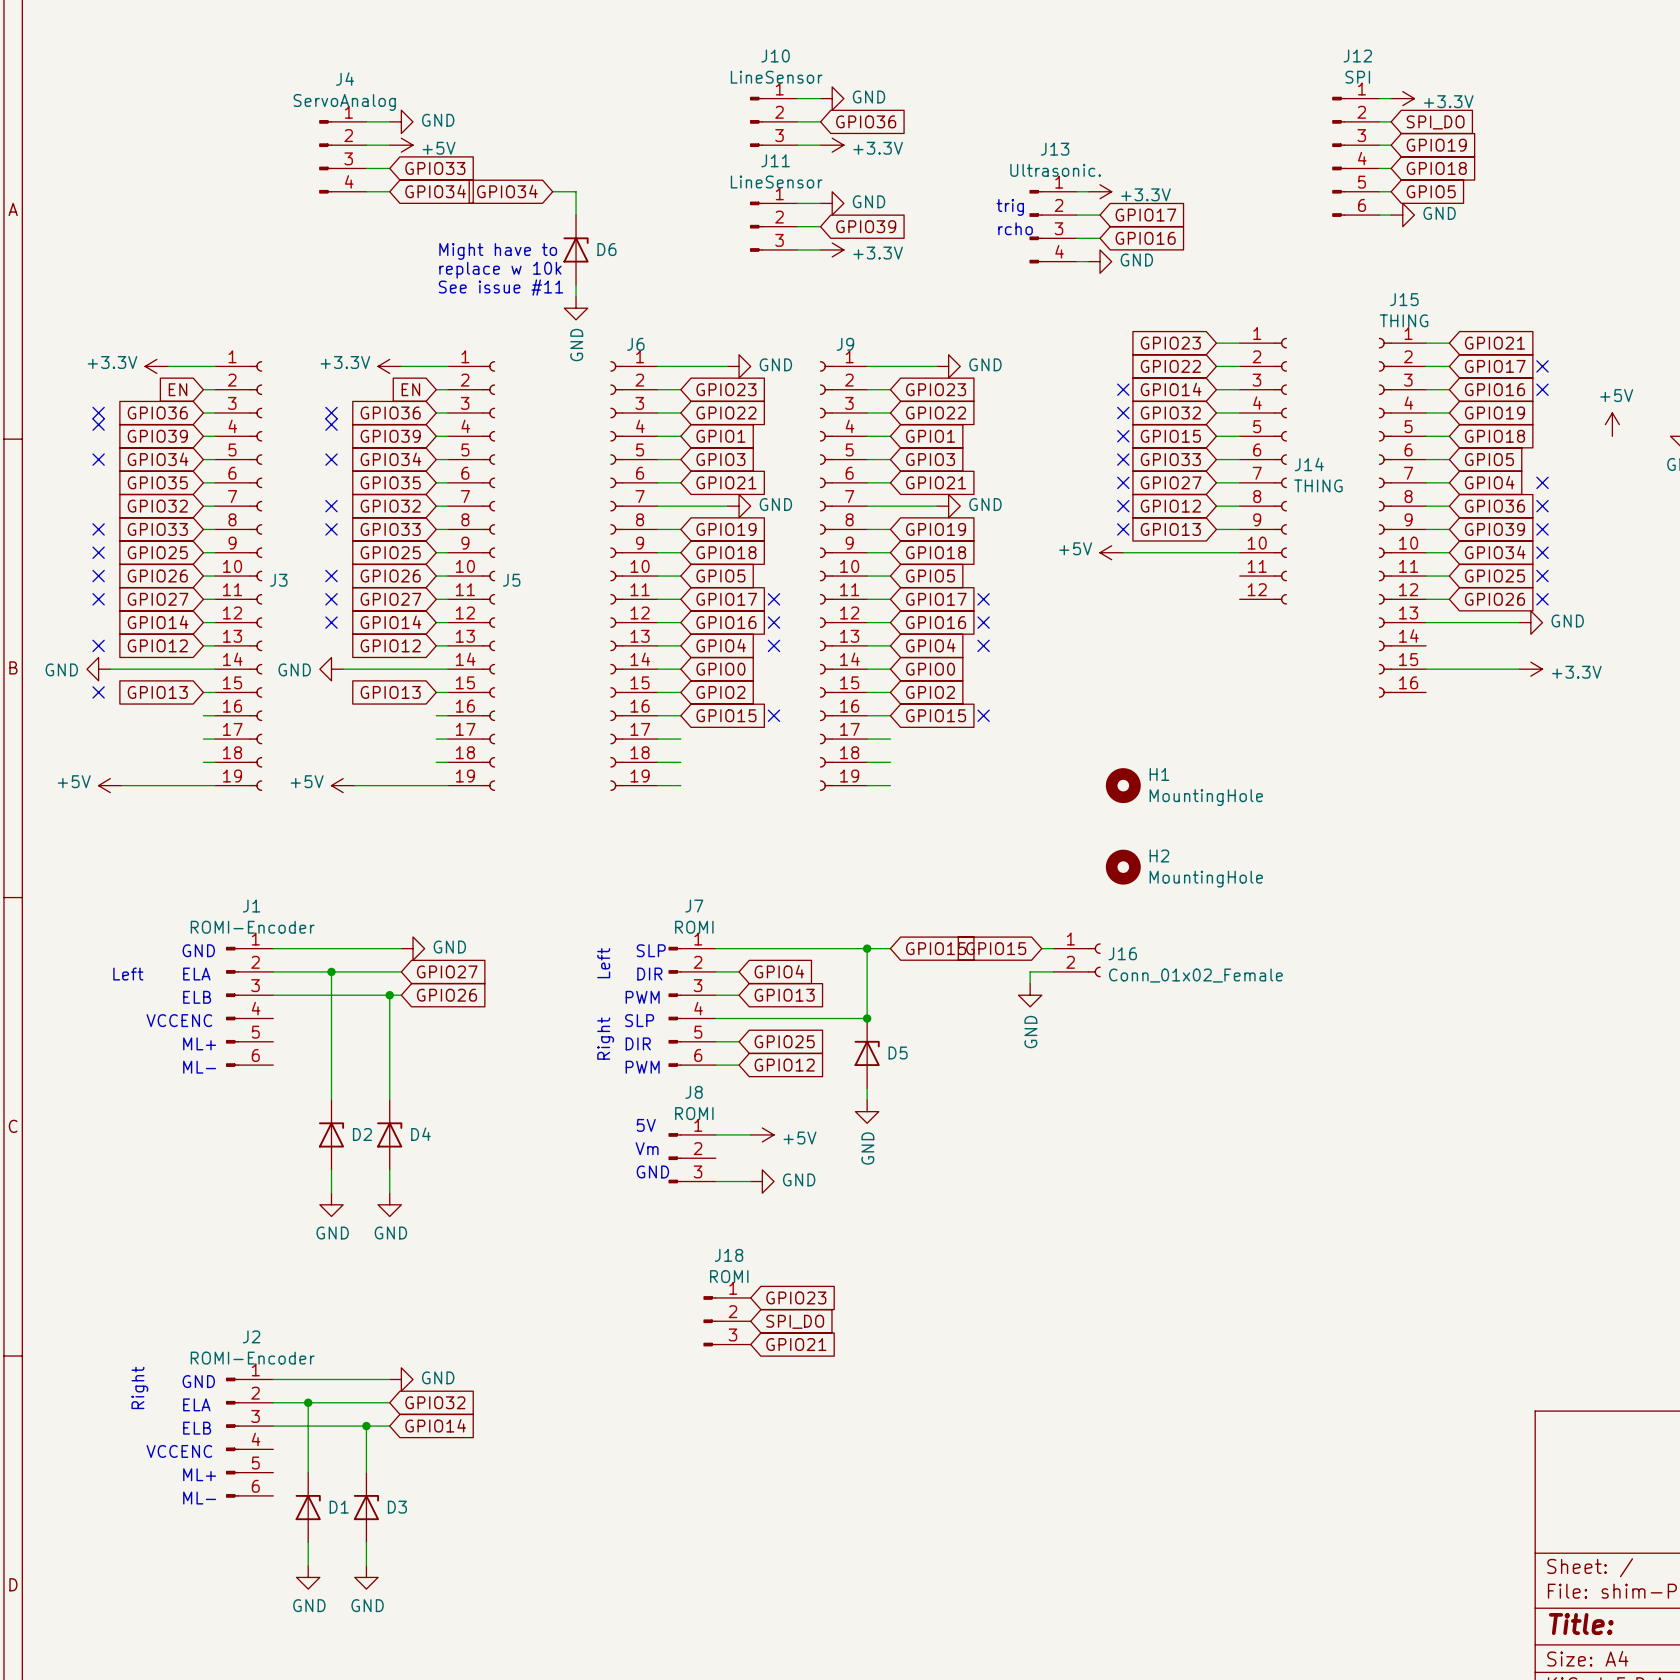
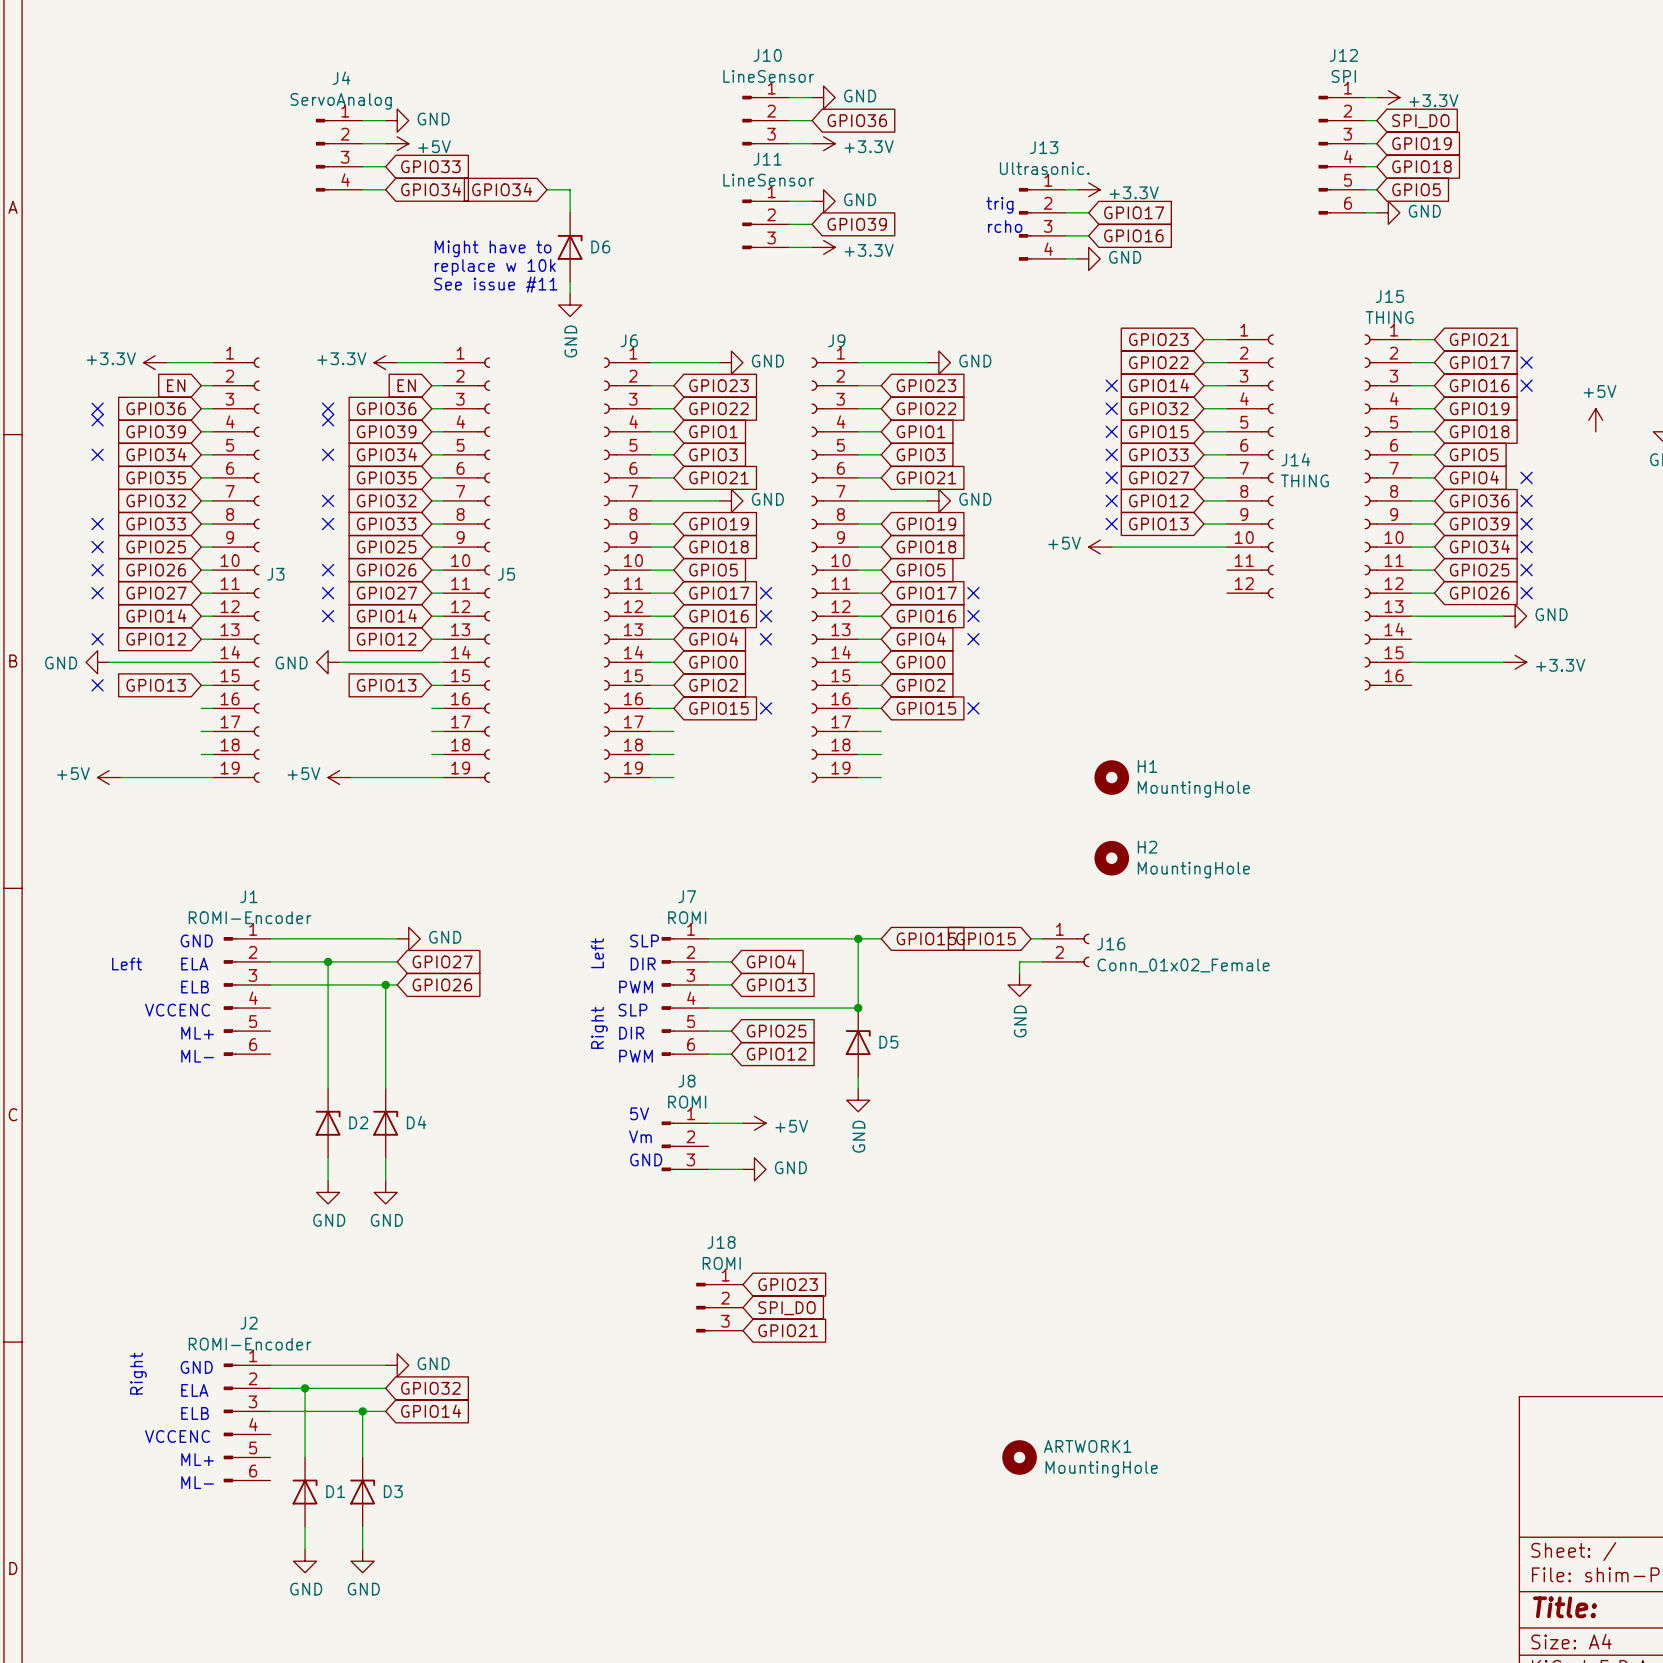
ARTWORK1: none -> MountingHole (1019, 1457)

